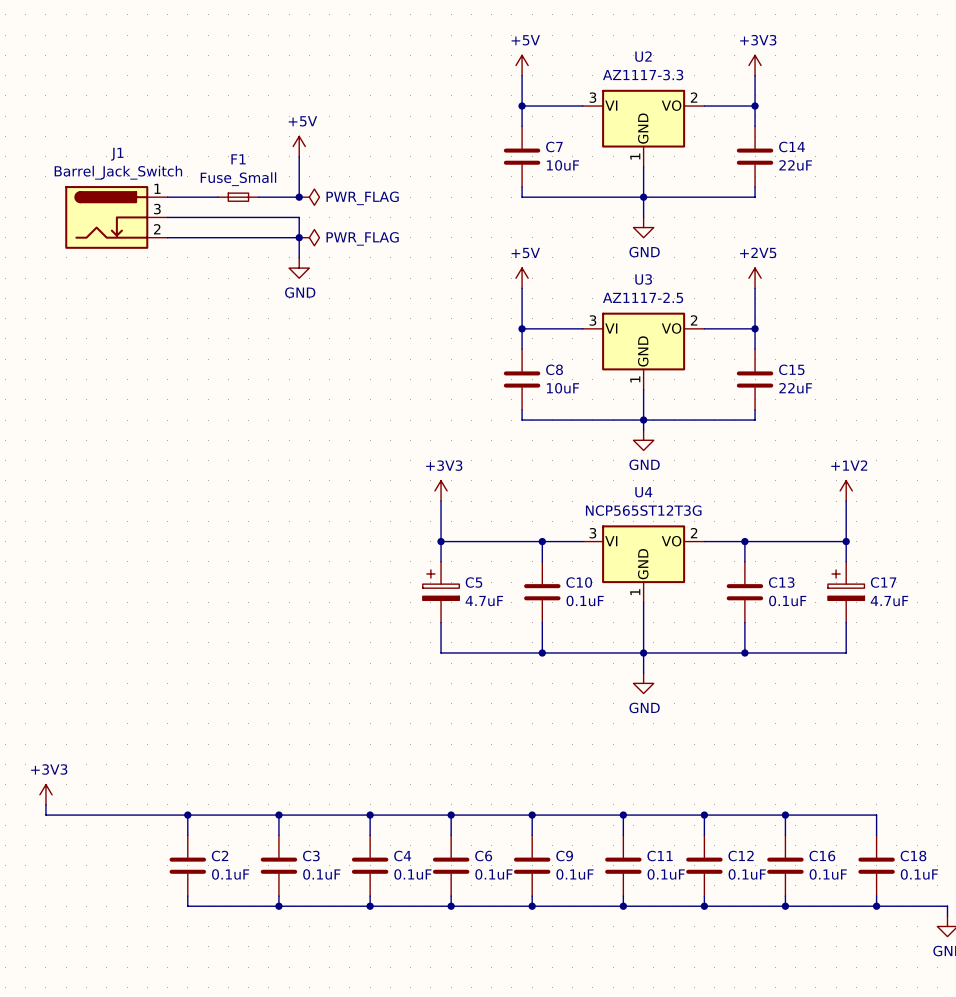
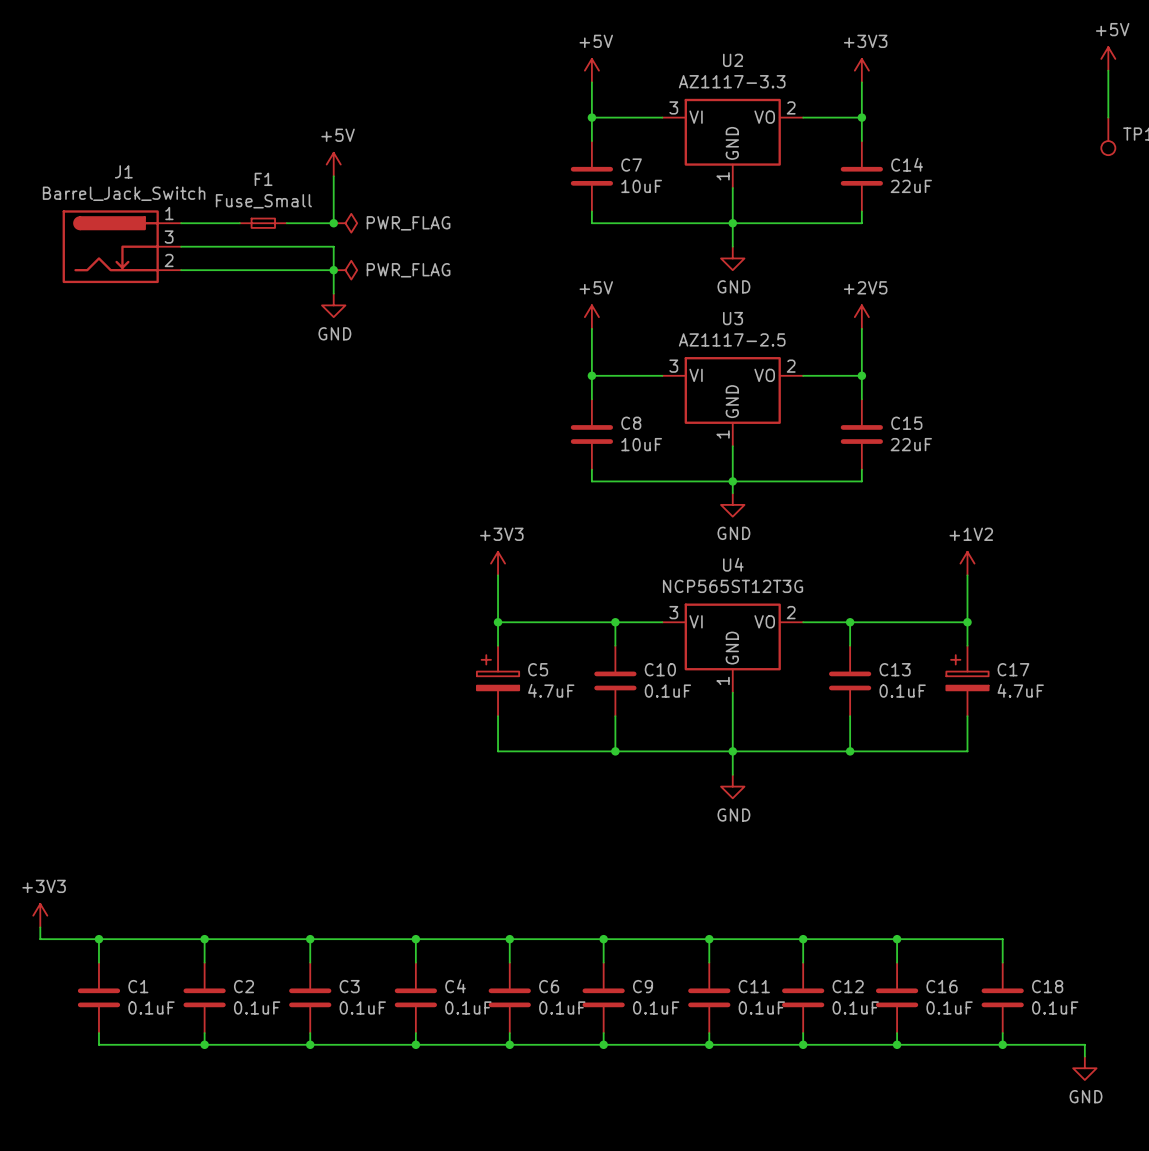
wire: none -> (98, 939) (98, 962)
junction: none -> (98, 939)
C1: none -> 0.1uF (98, 997)
wire: none -> (98, 1033) (98, 1044) (204, 1044)
junction: none -> (204, 1044)

